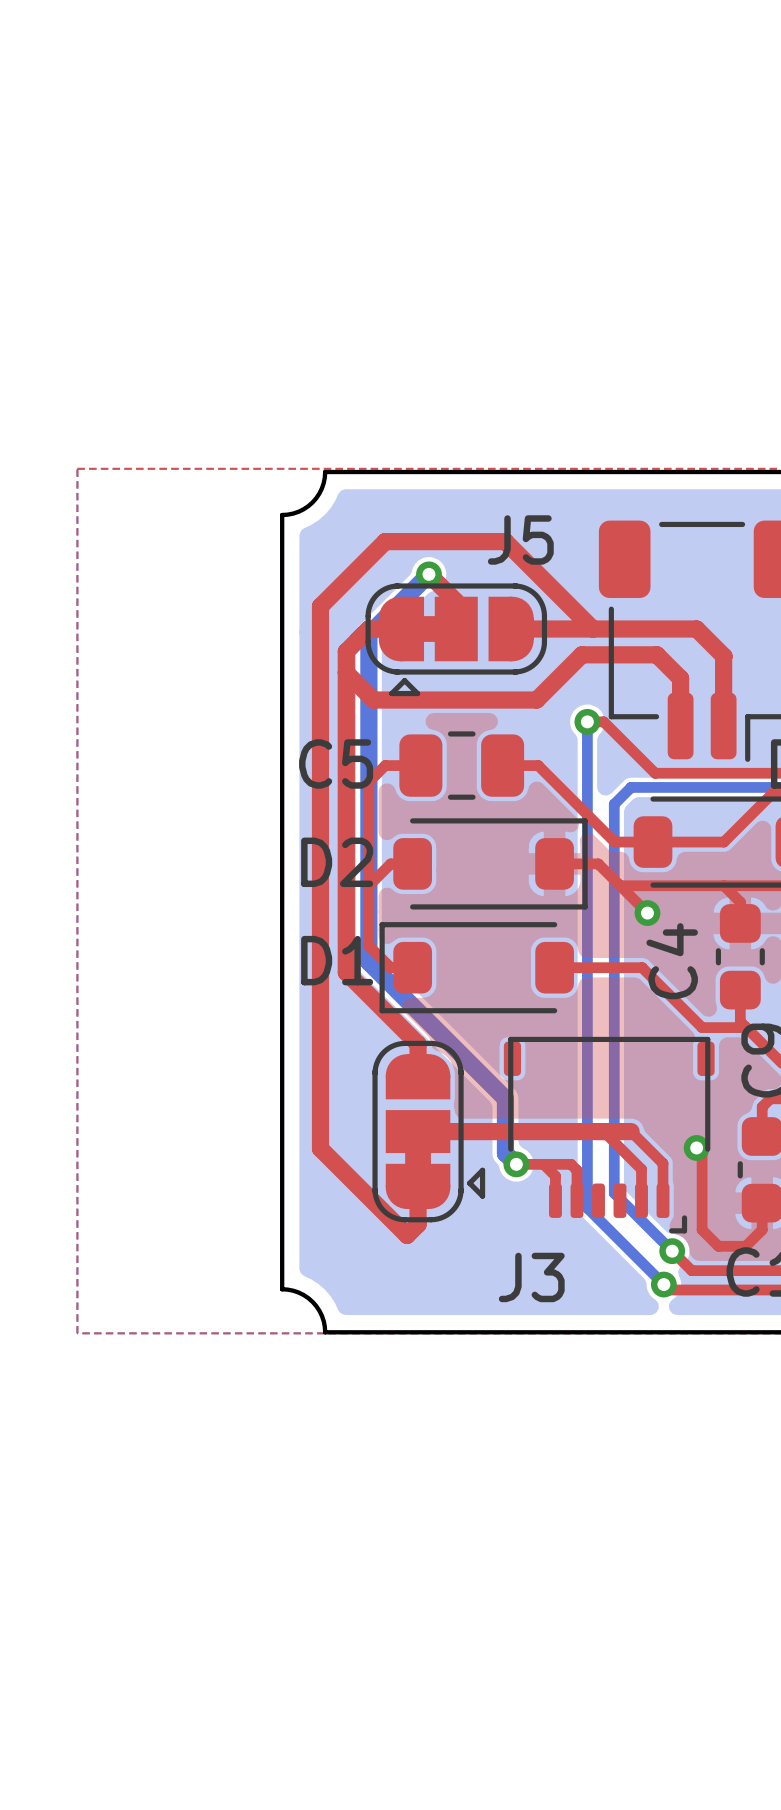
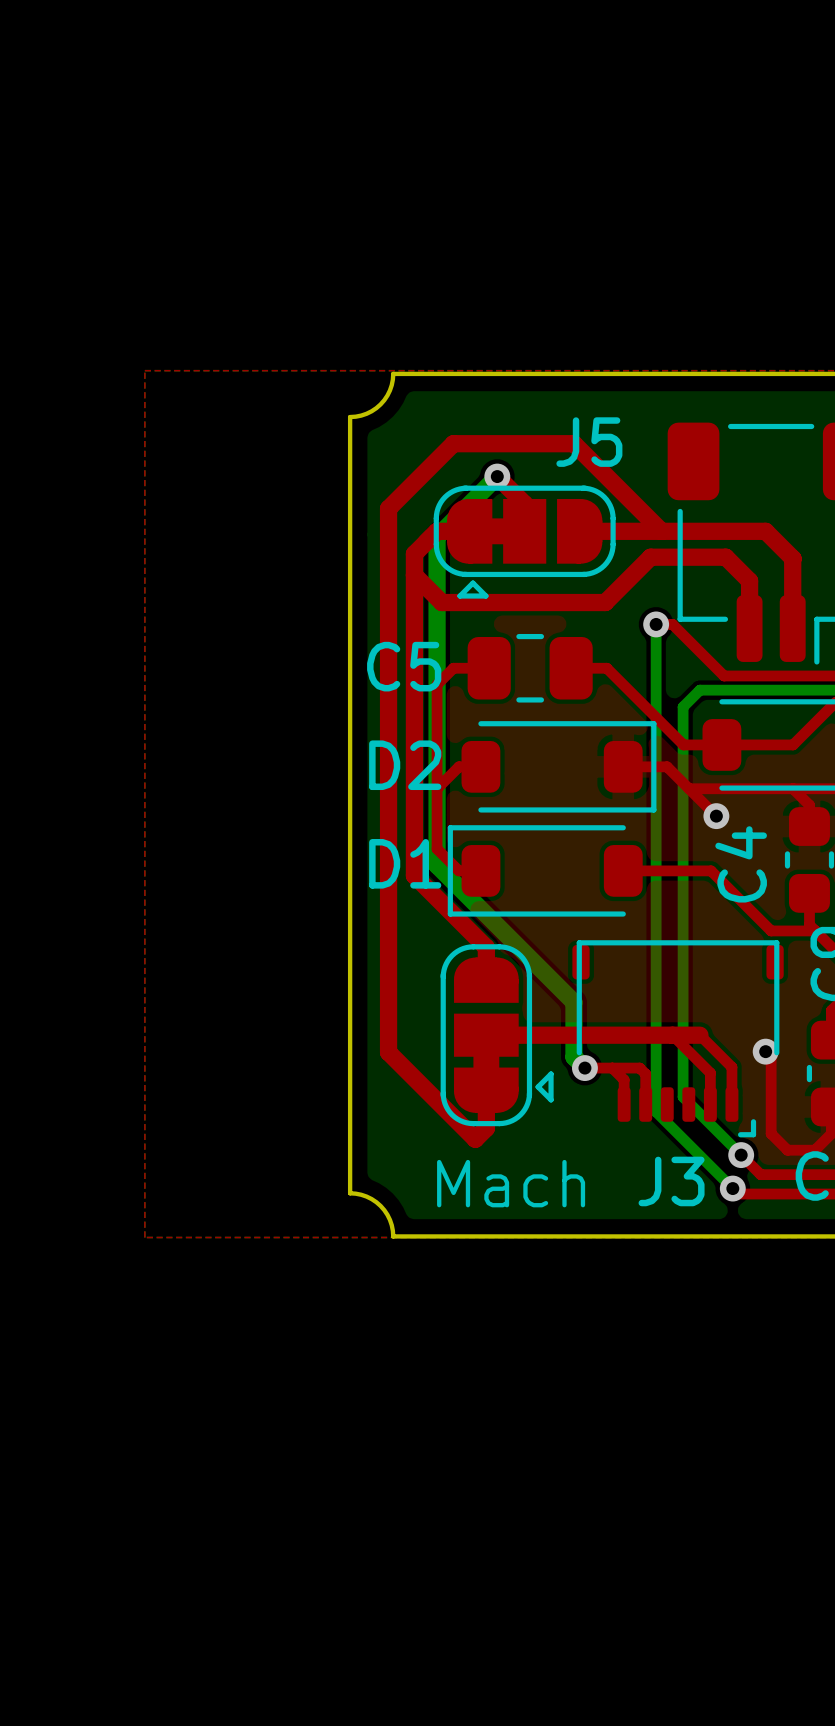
J3 name position: J3 (531, 1277) -> J3 (671, 1181)
text: none -> Mach (511, 1183)

